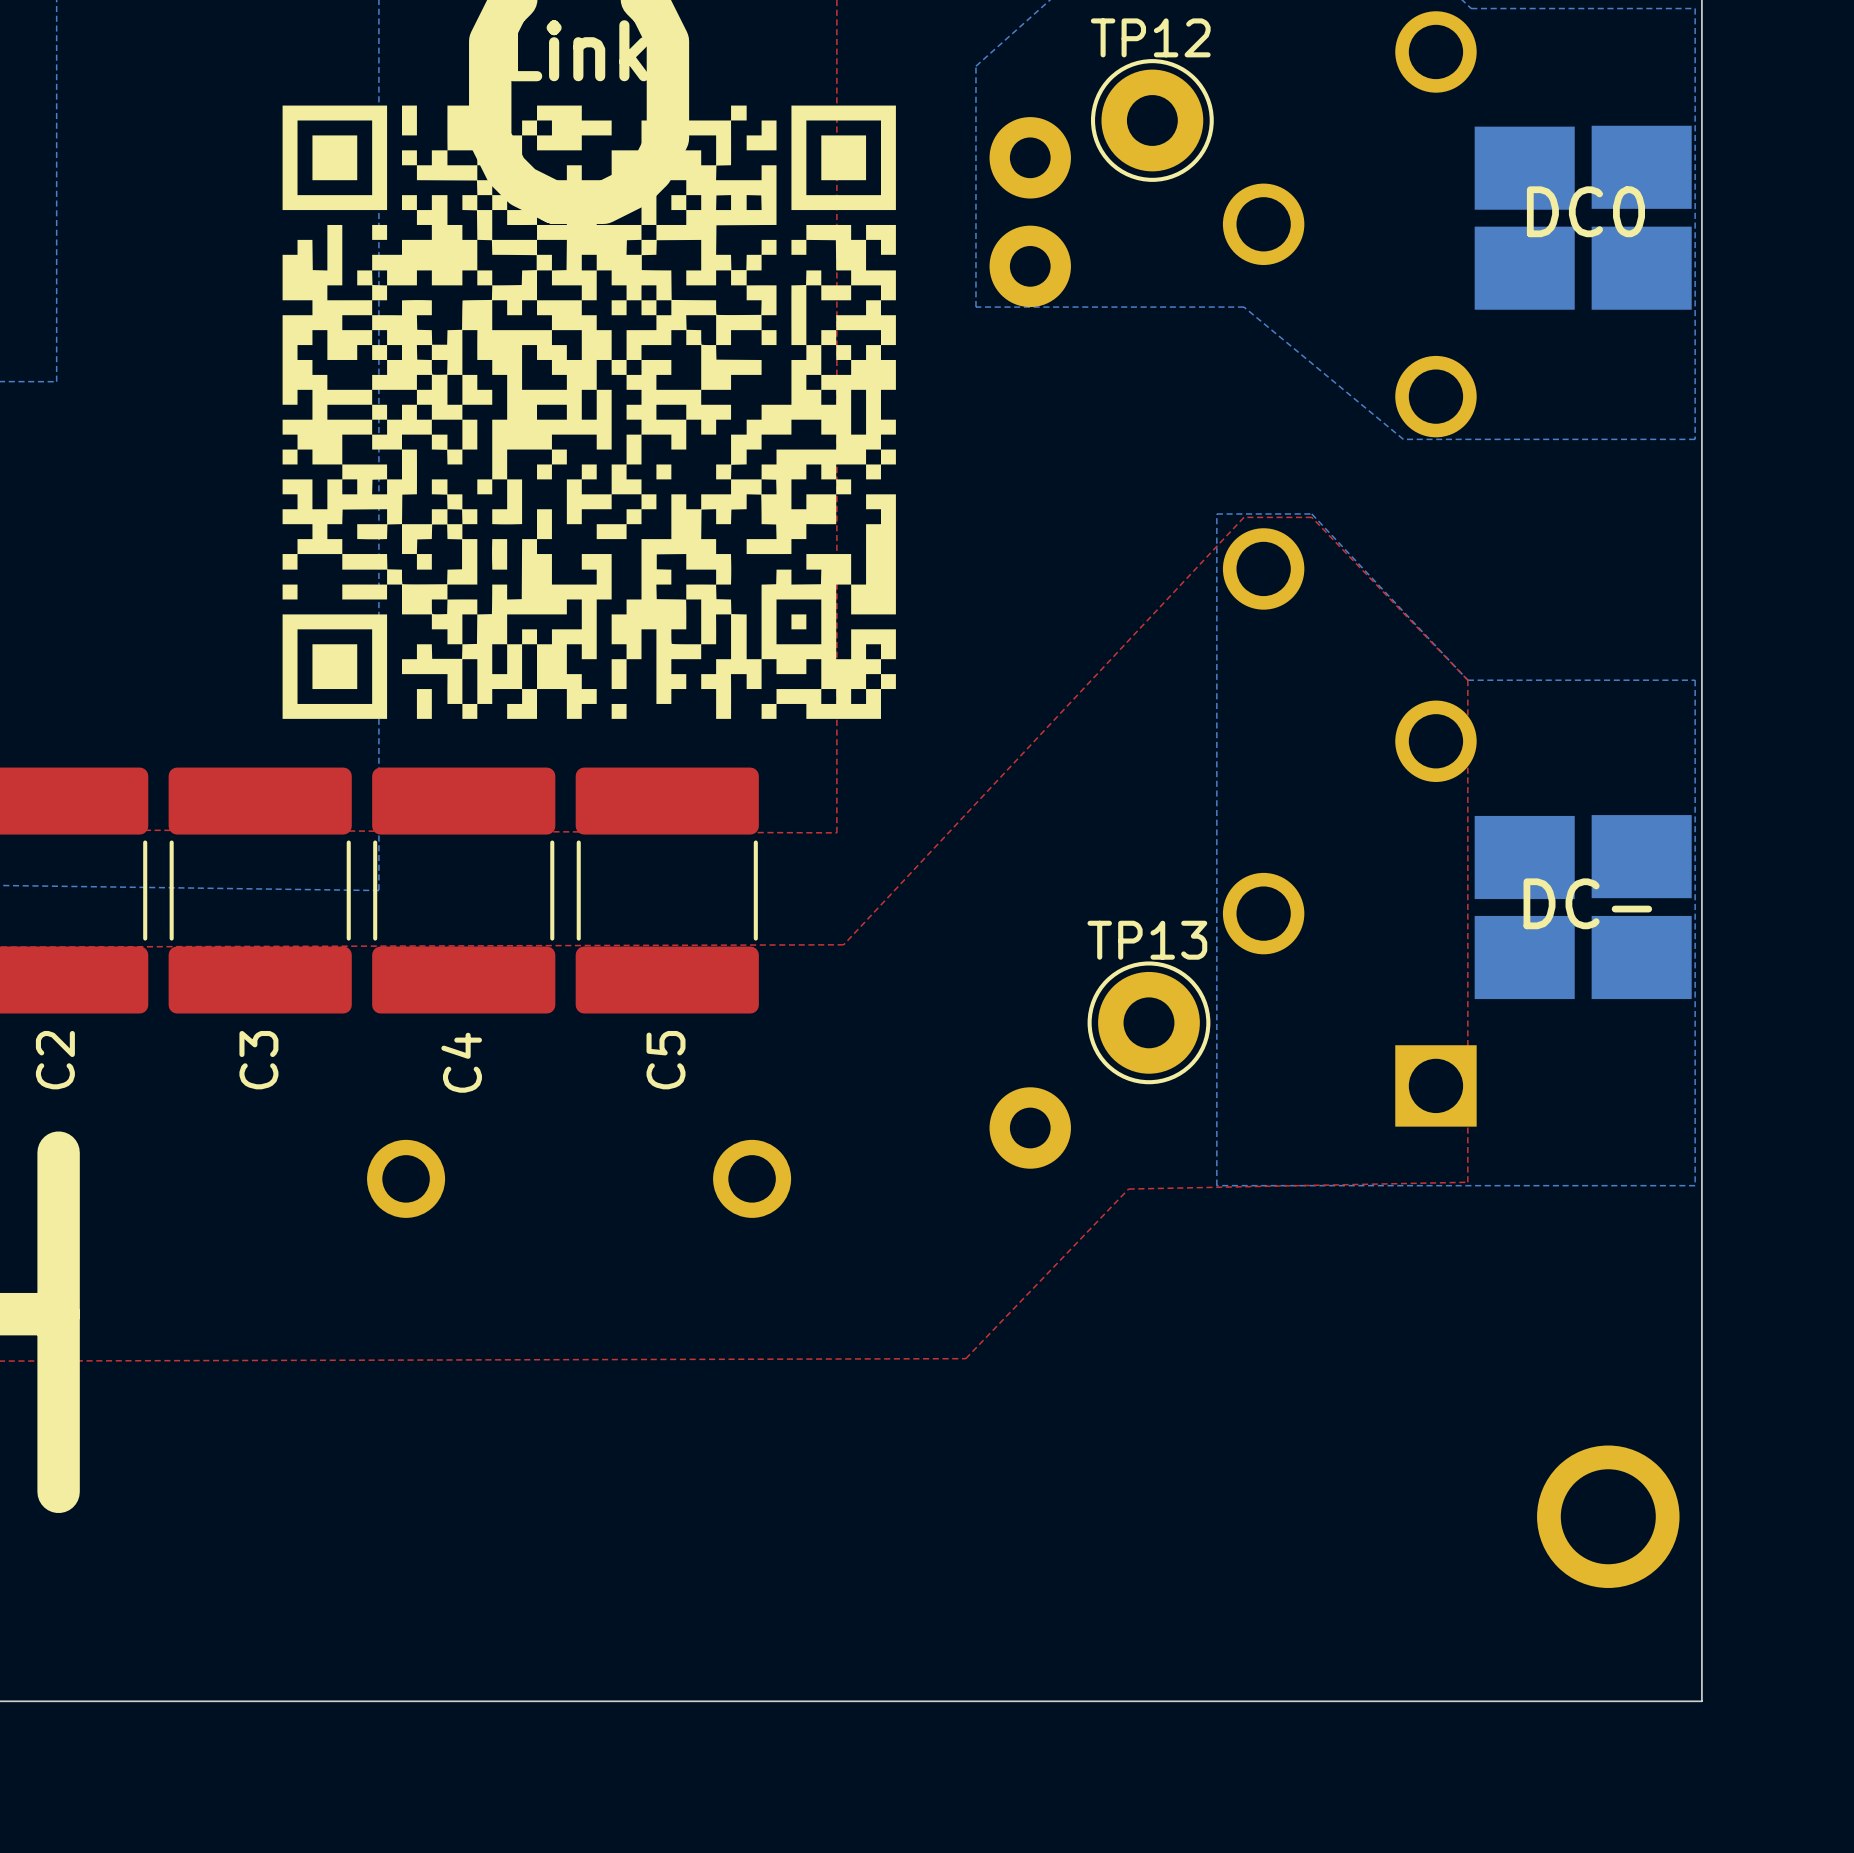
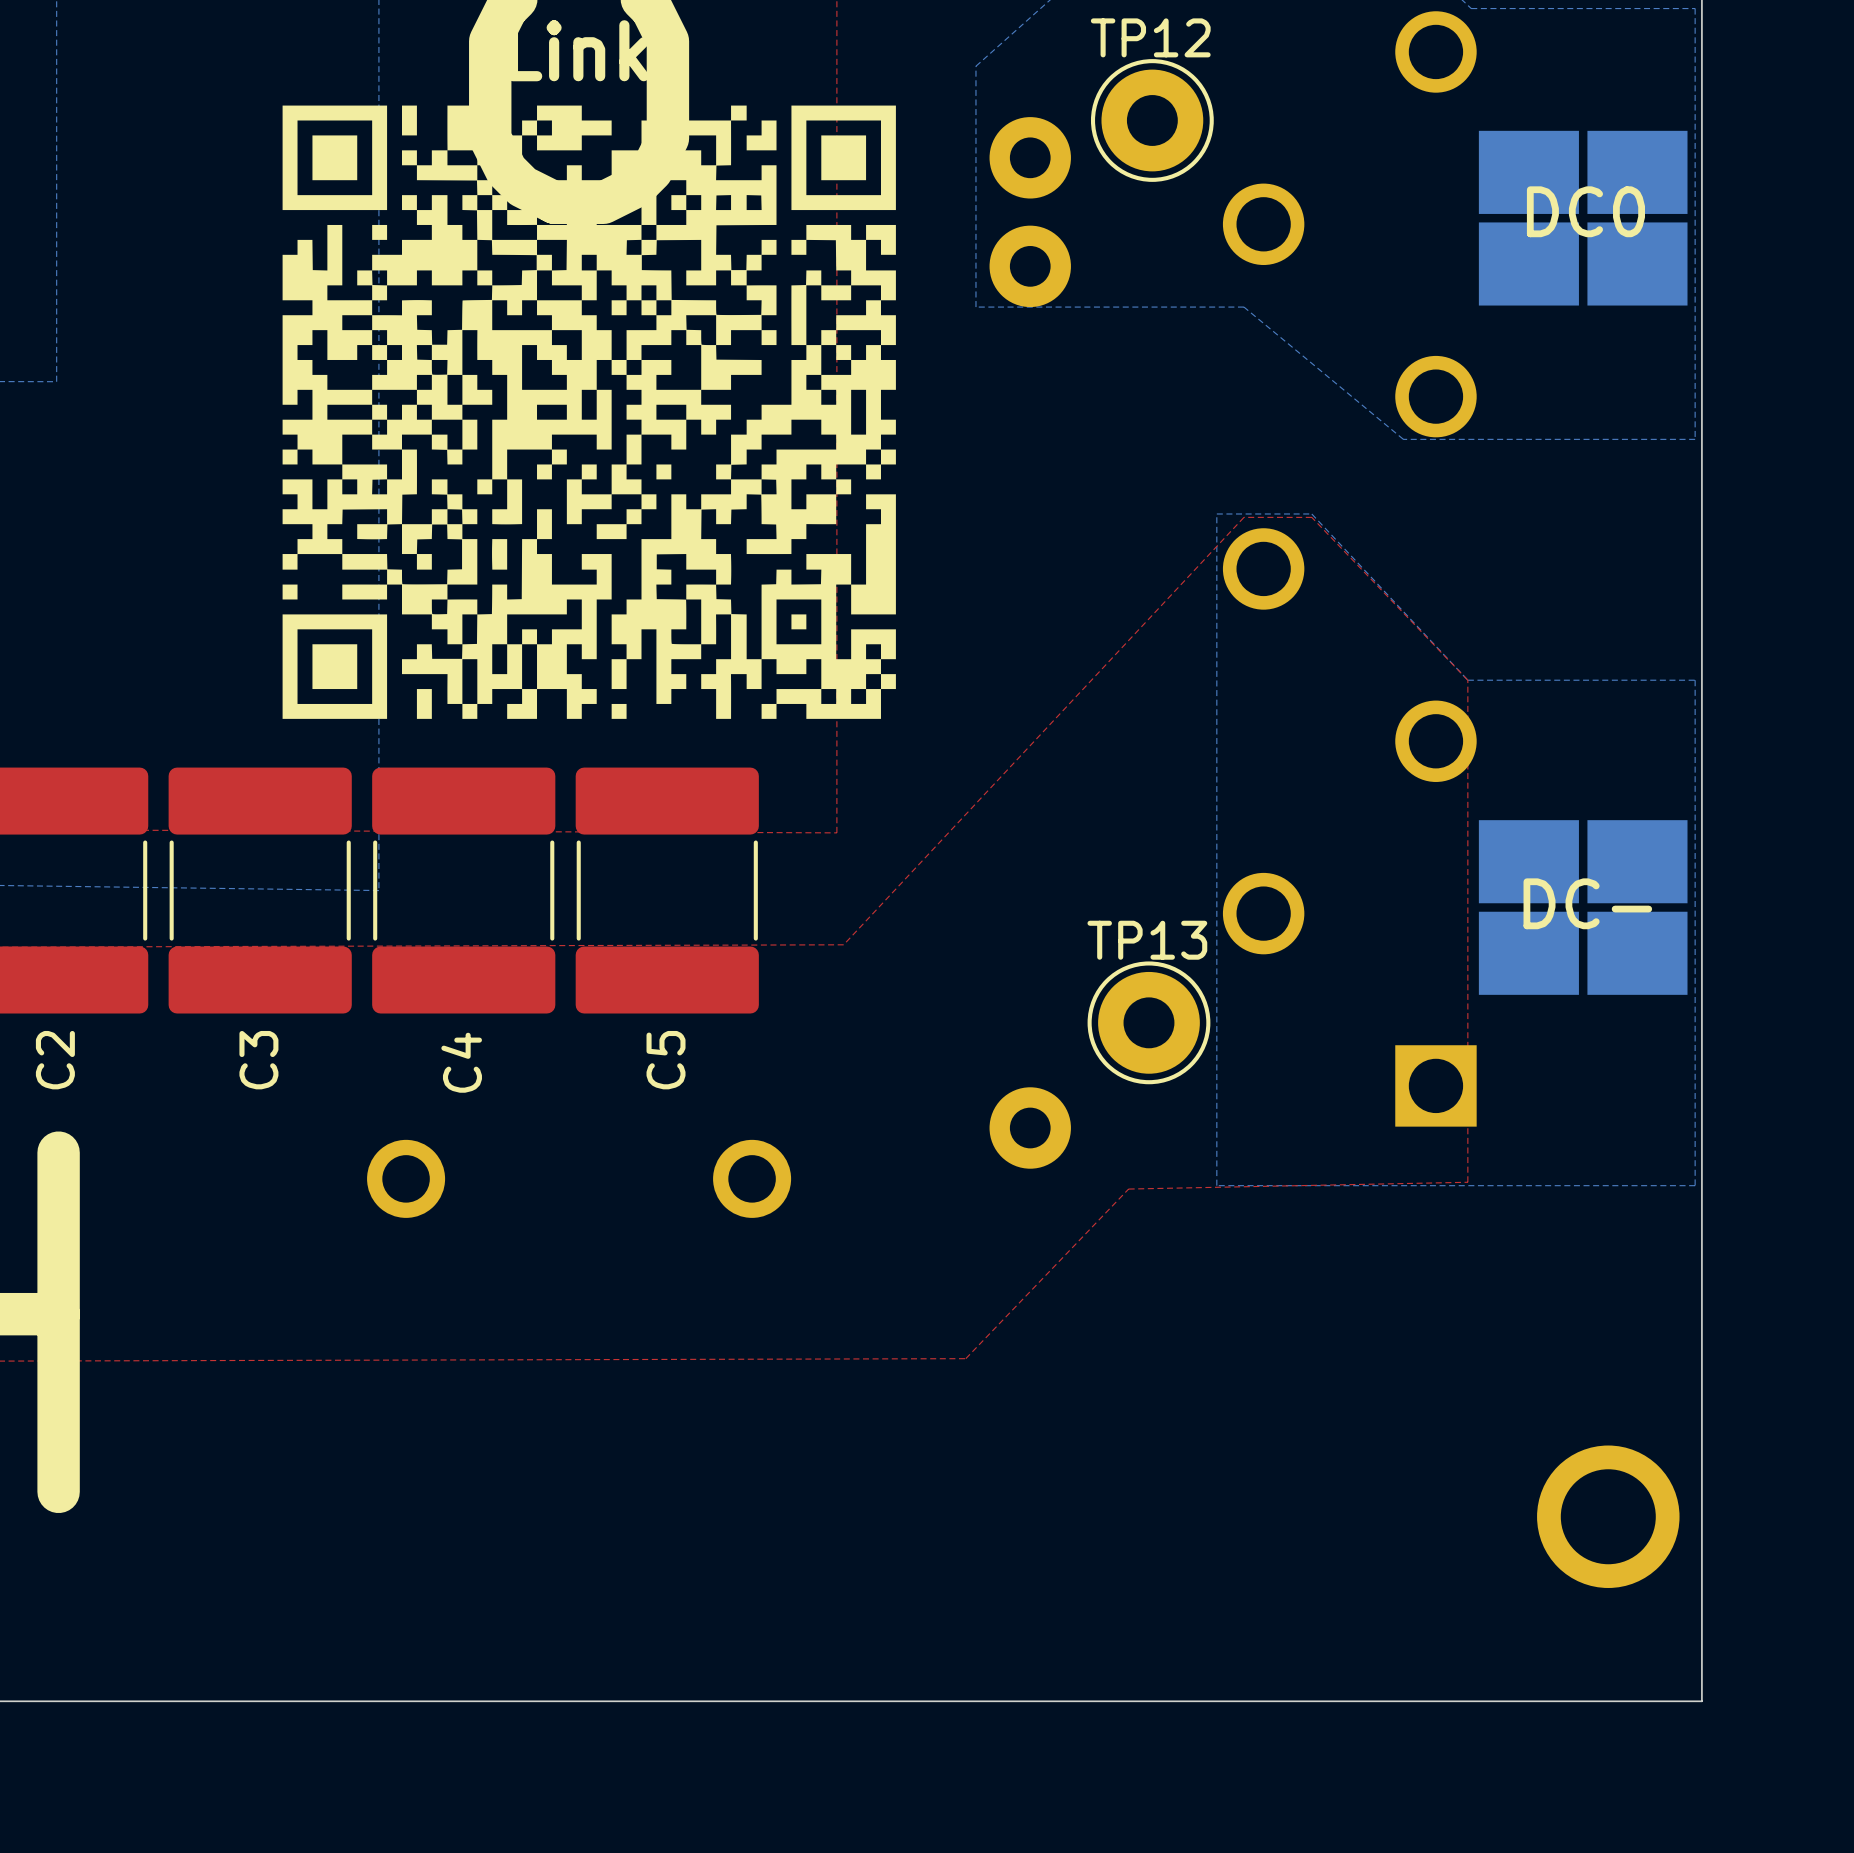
part footprint: [1474, 125, 1692, 310] -> [1478, 130, 1688, 306]
part footprint: [1474, 815, 1692, 1000] -> [1478, 820, 1688, 995]

